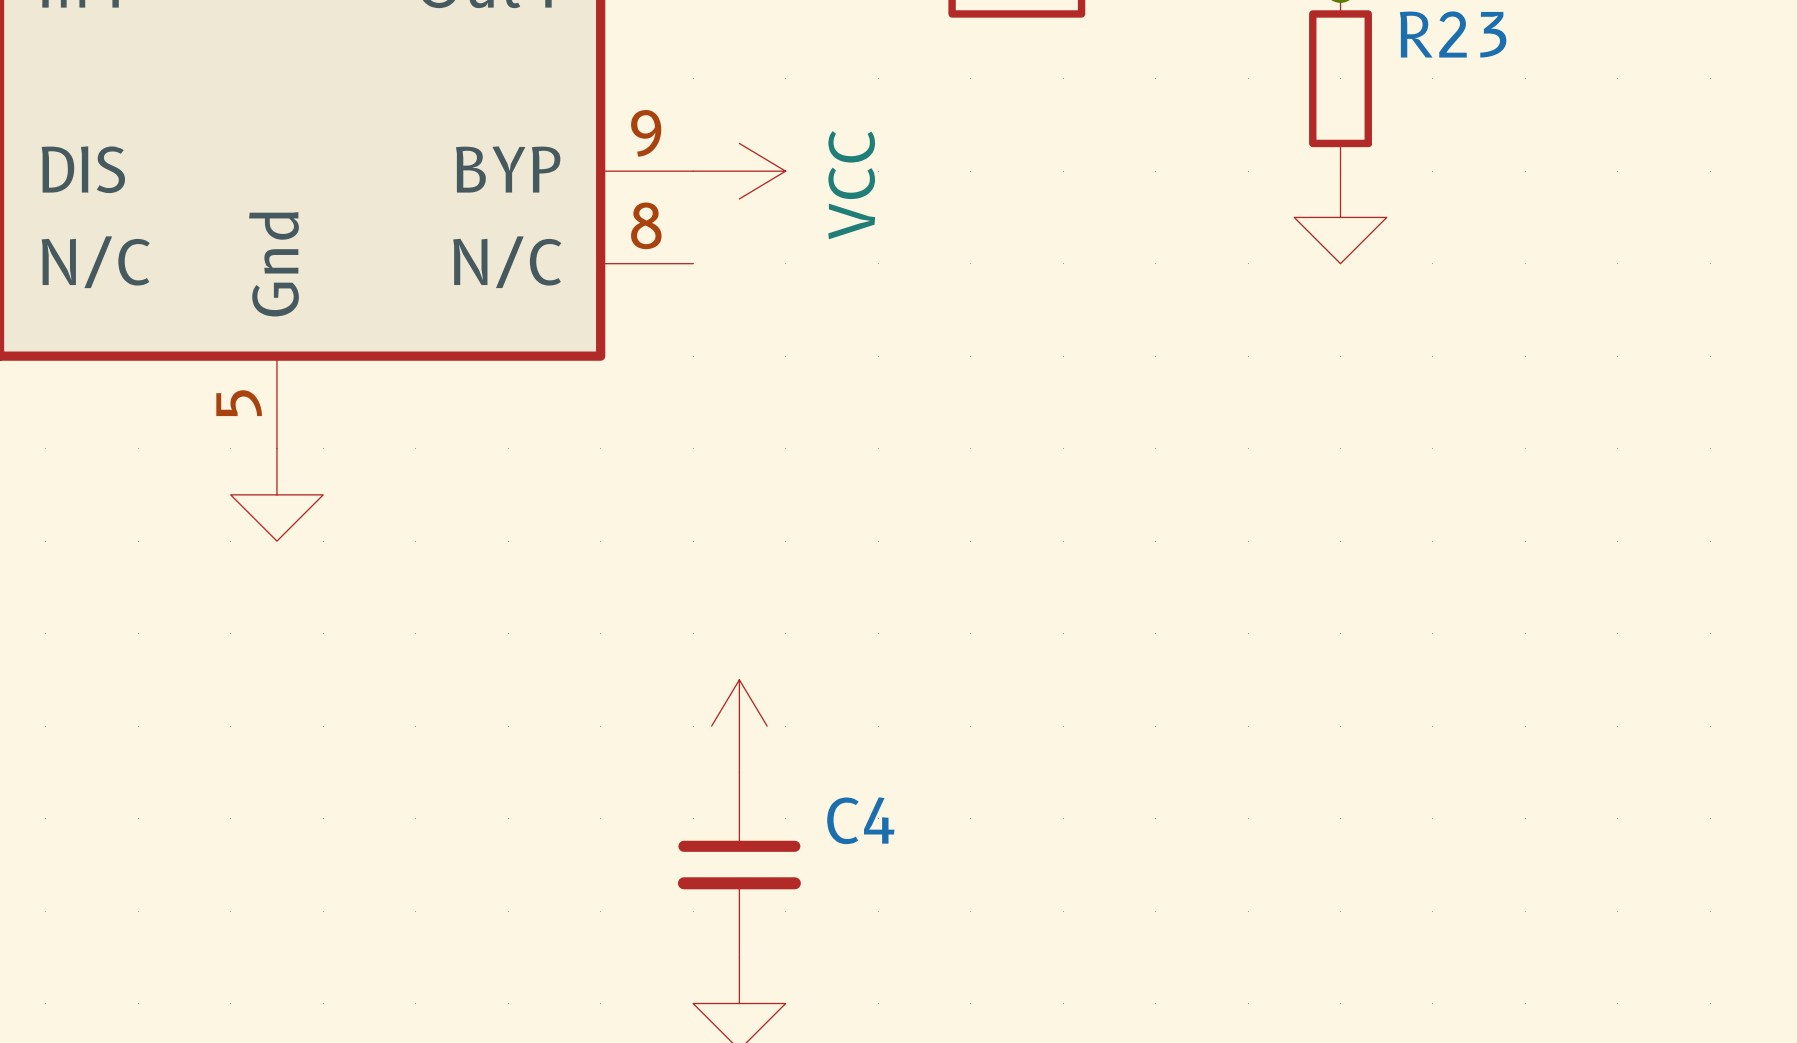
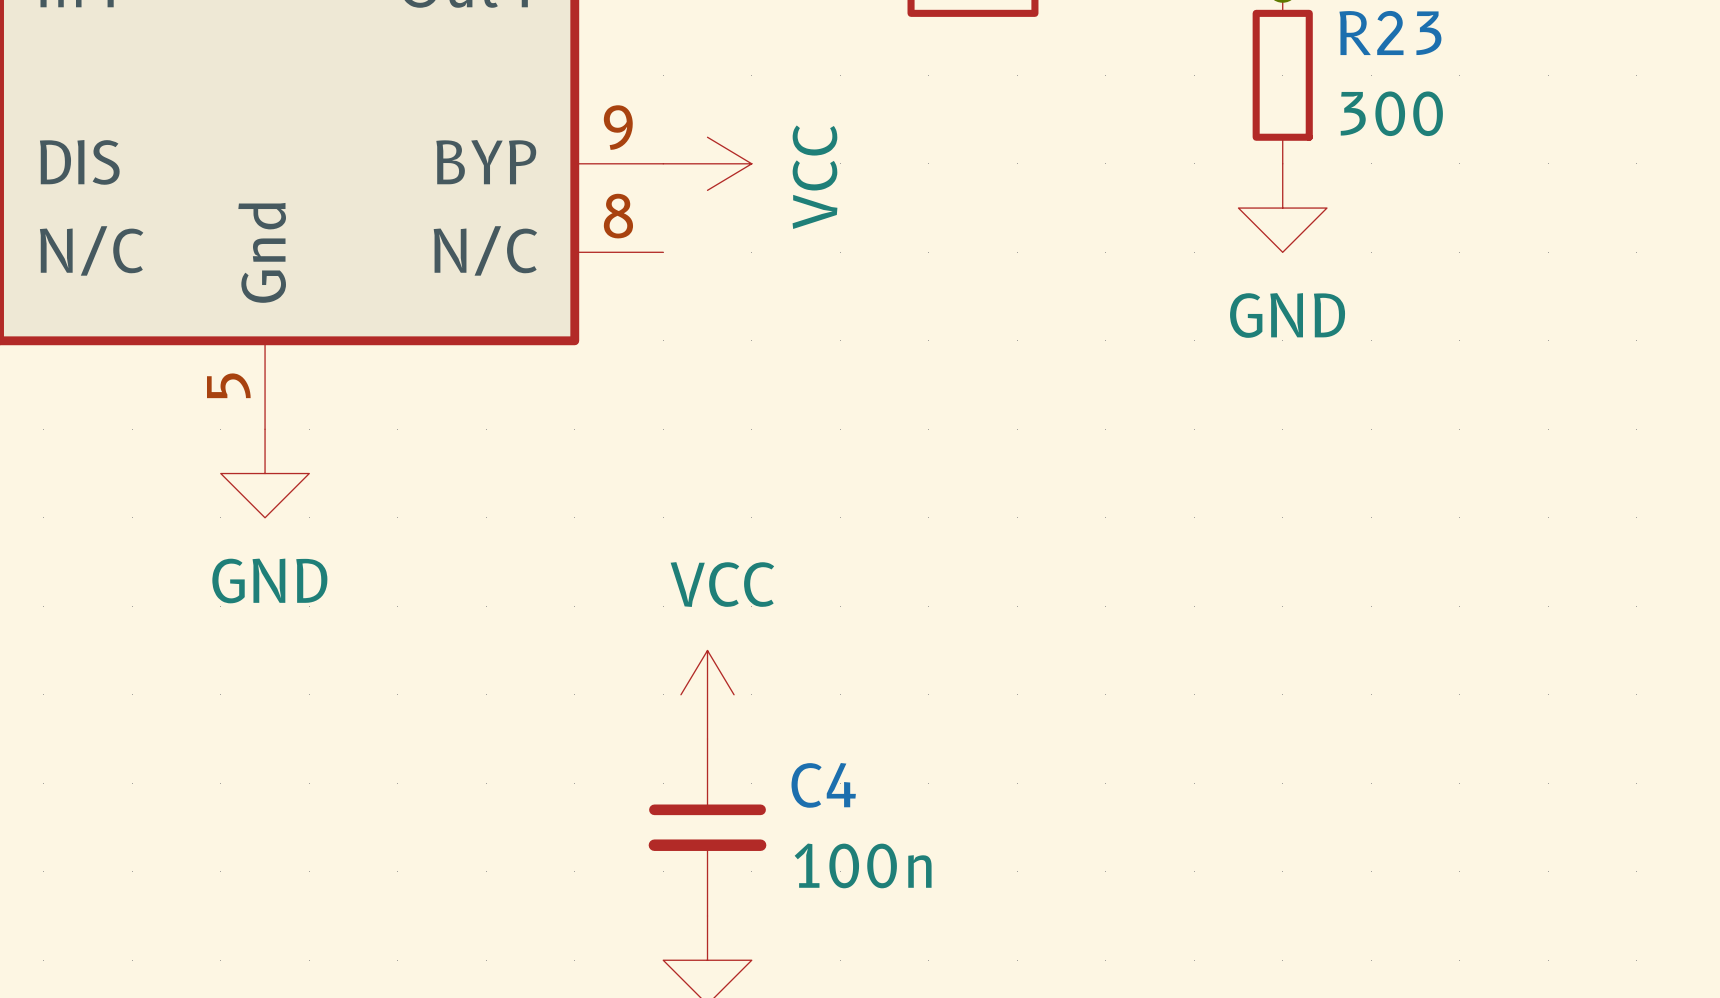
R23 value: none -> 300 (1391, 113)
power symbol text: none -> GND (1287, 315)
power symbol text: none -> GND (269, 580)
power symbol text: none -> VCC (722, 584)
C4 value: none -> 100n (863, 865)

